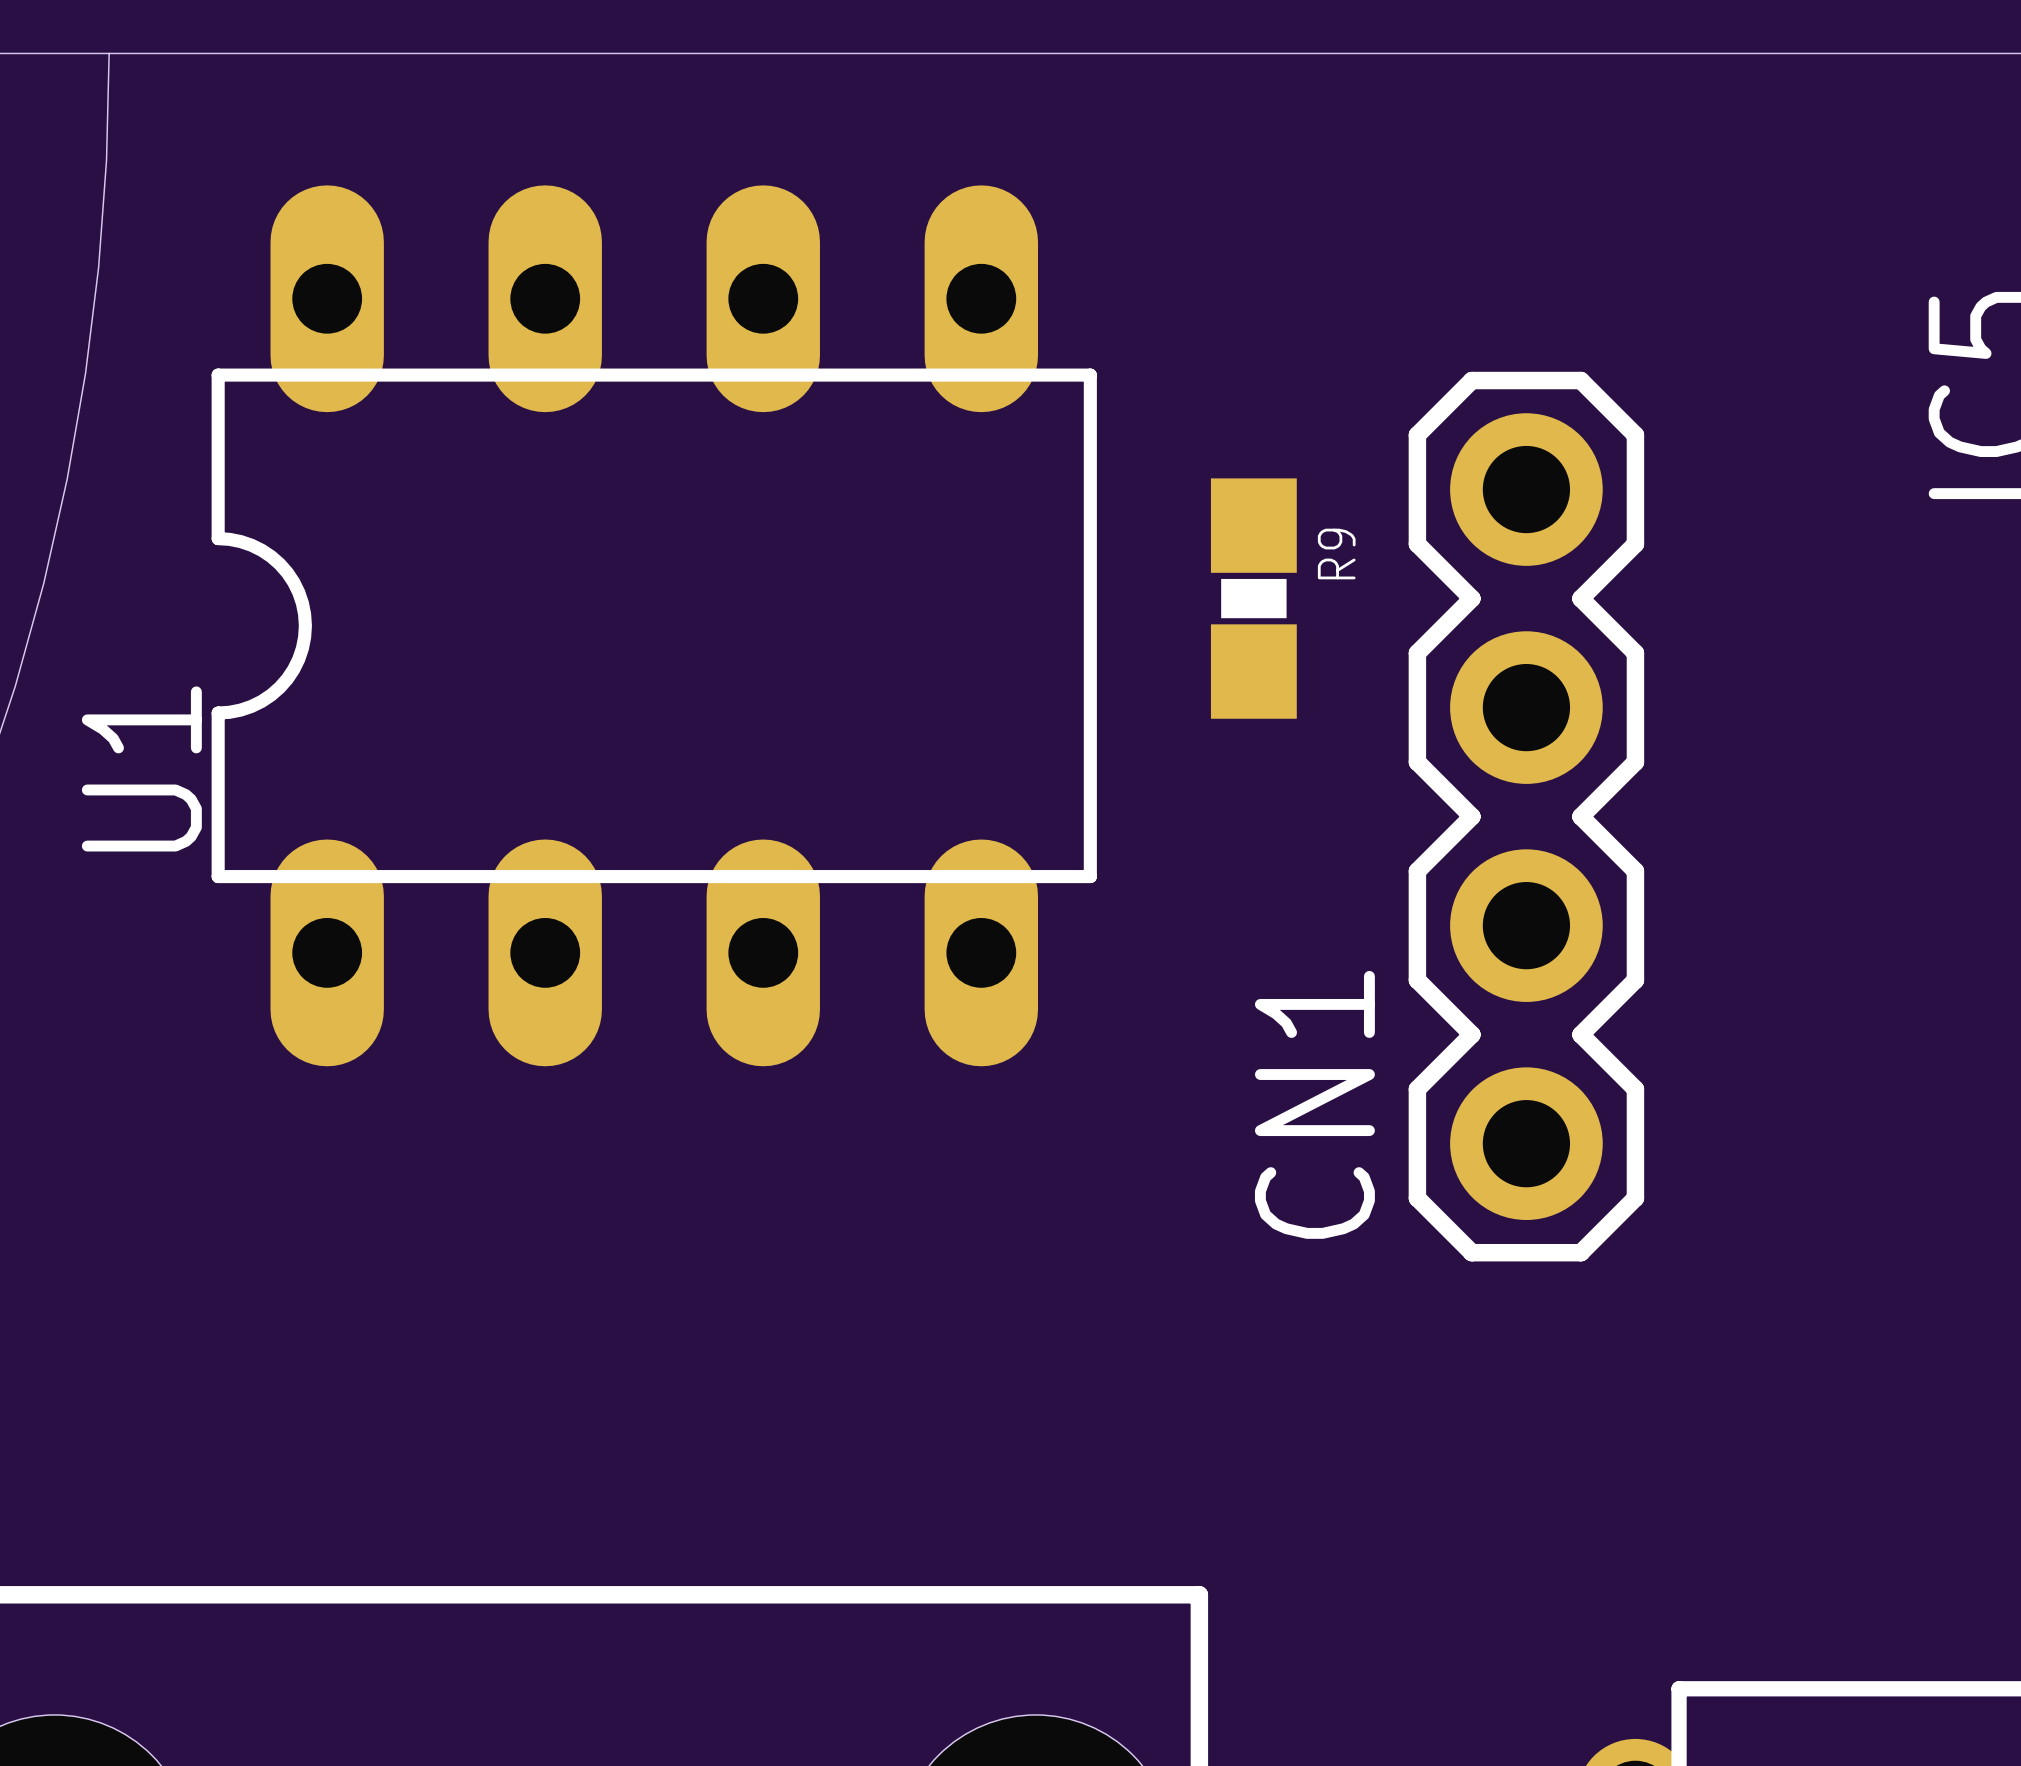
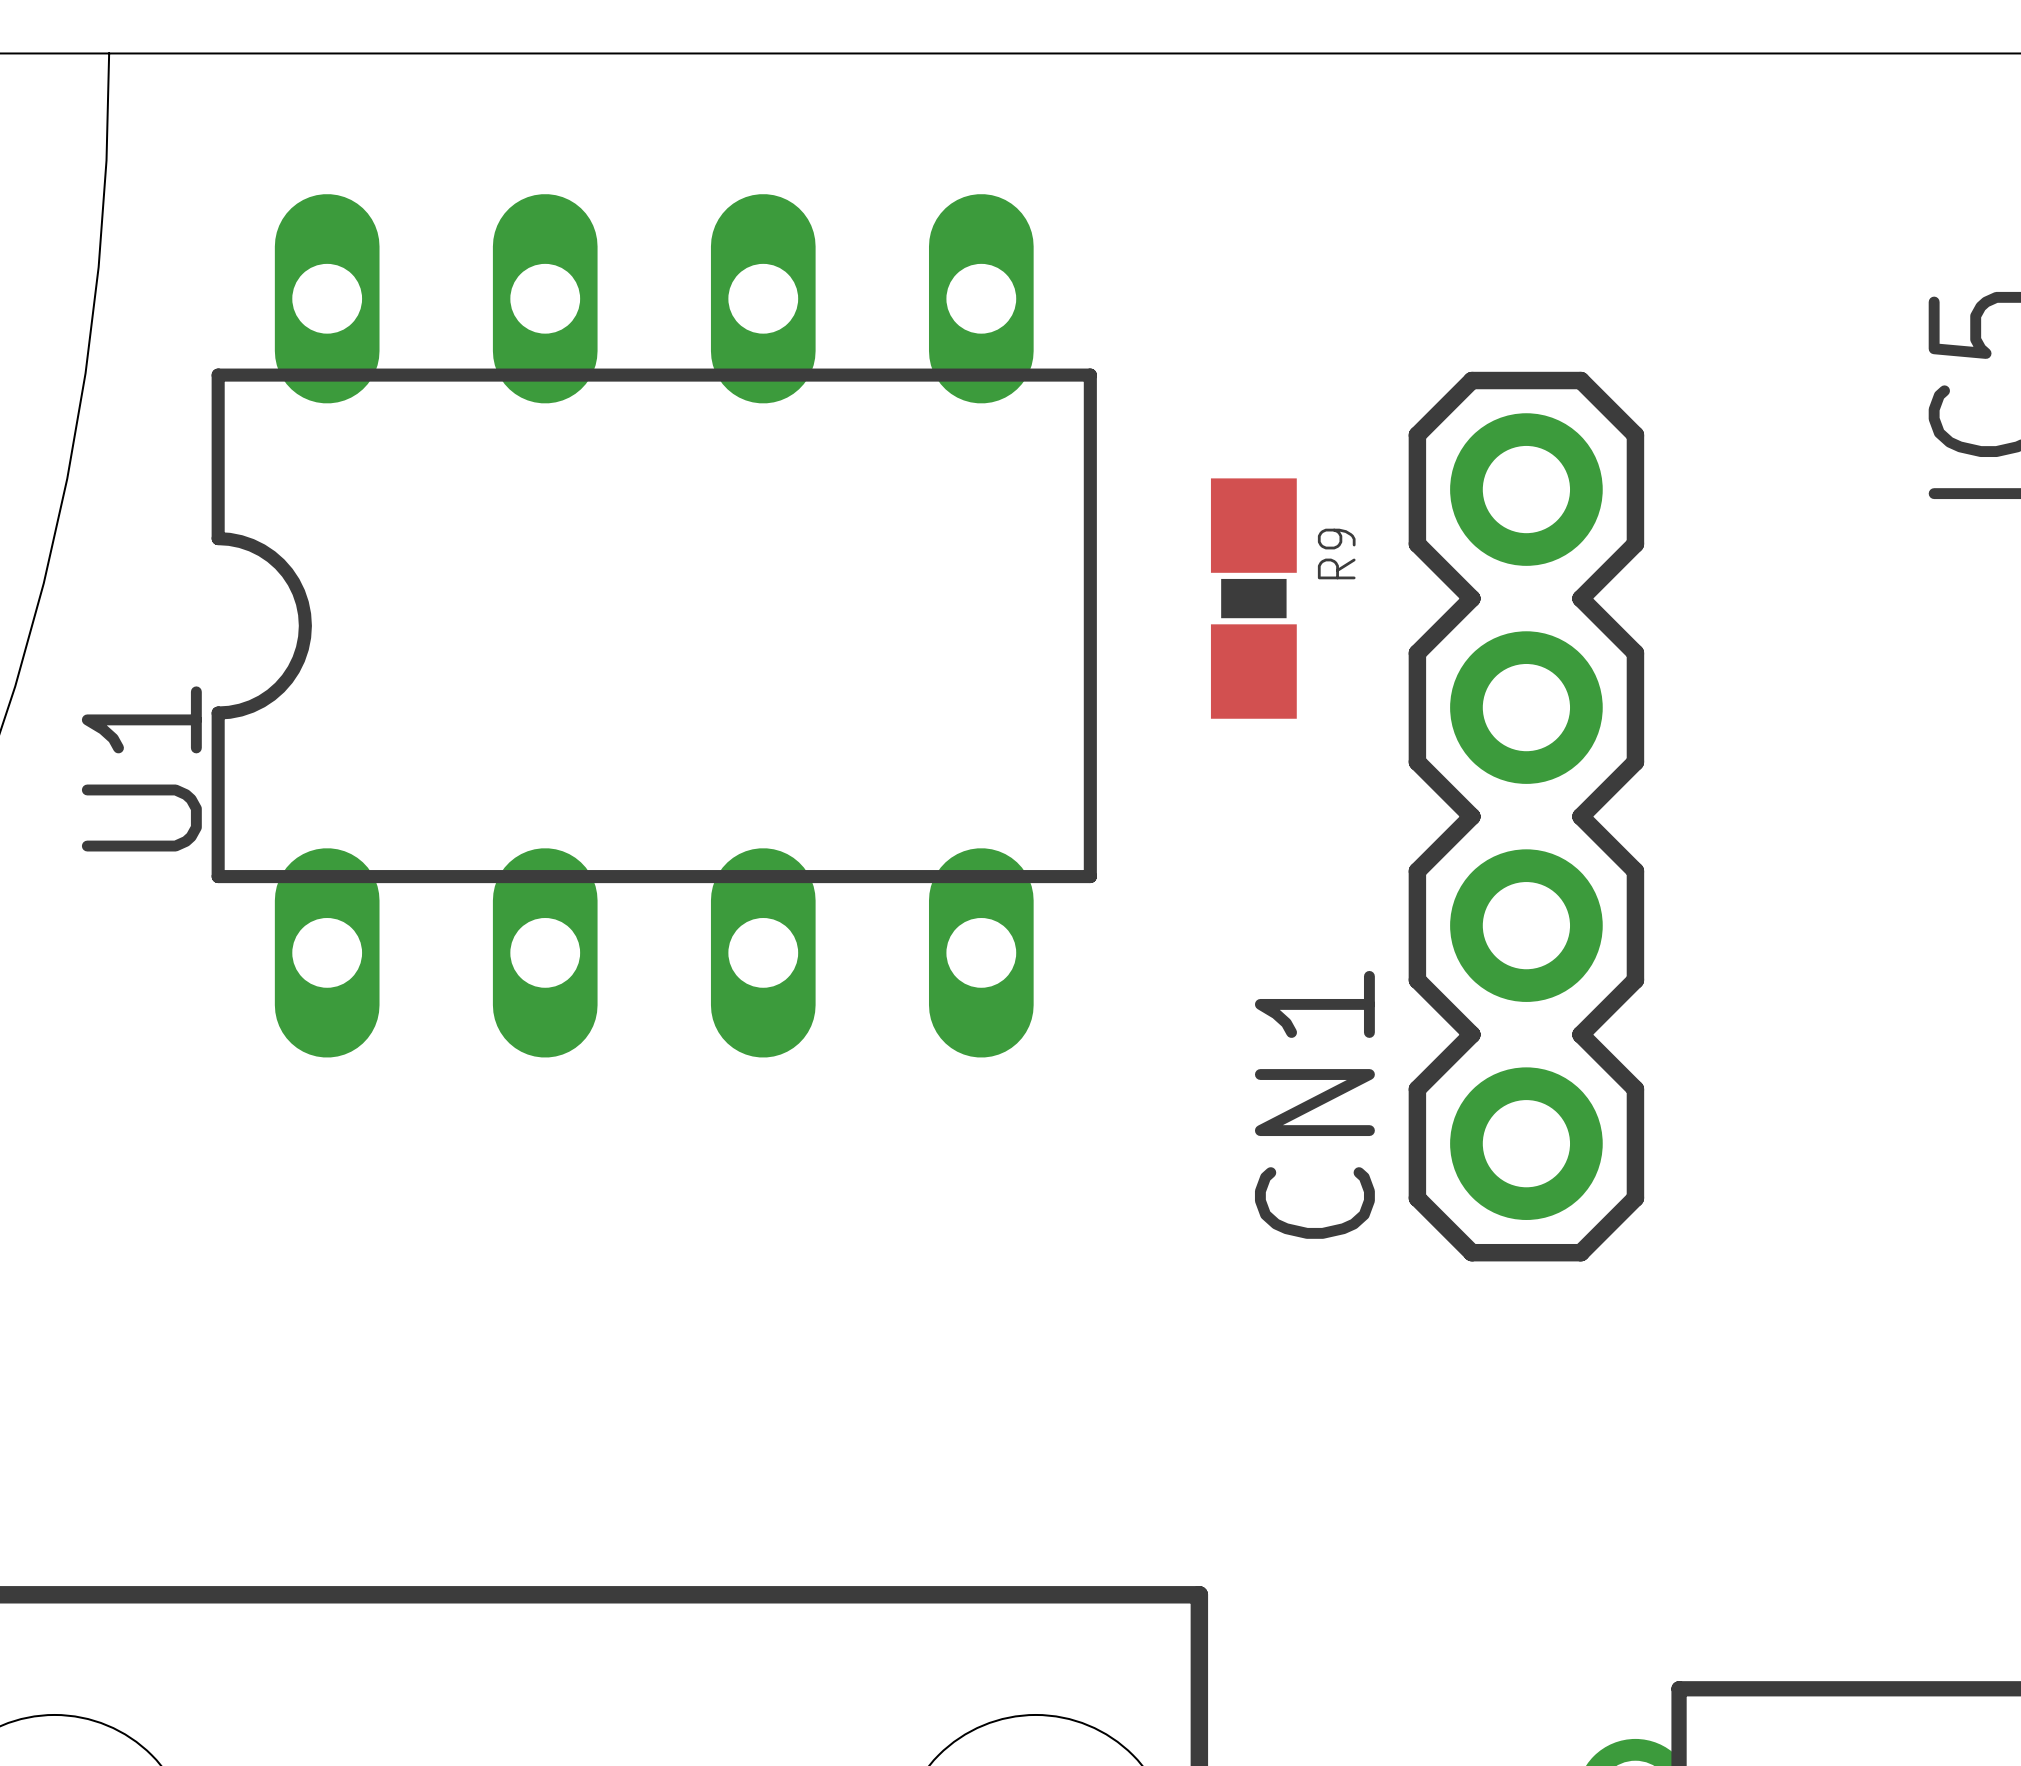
U1 footprint: [211, 185, 1097, 1067] -> [211, 194, 1097, 1058]

